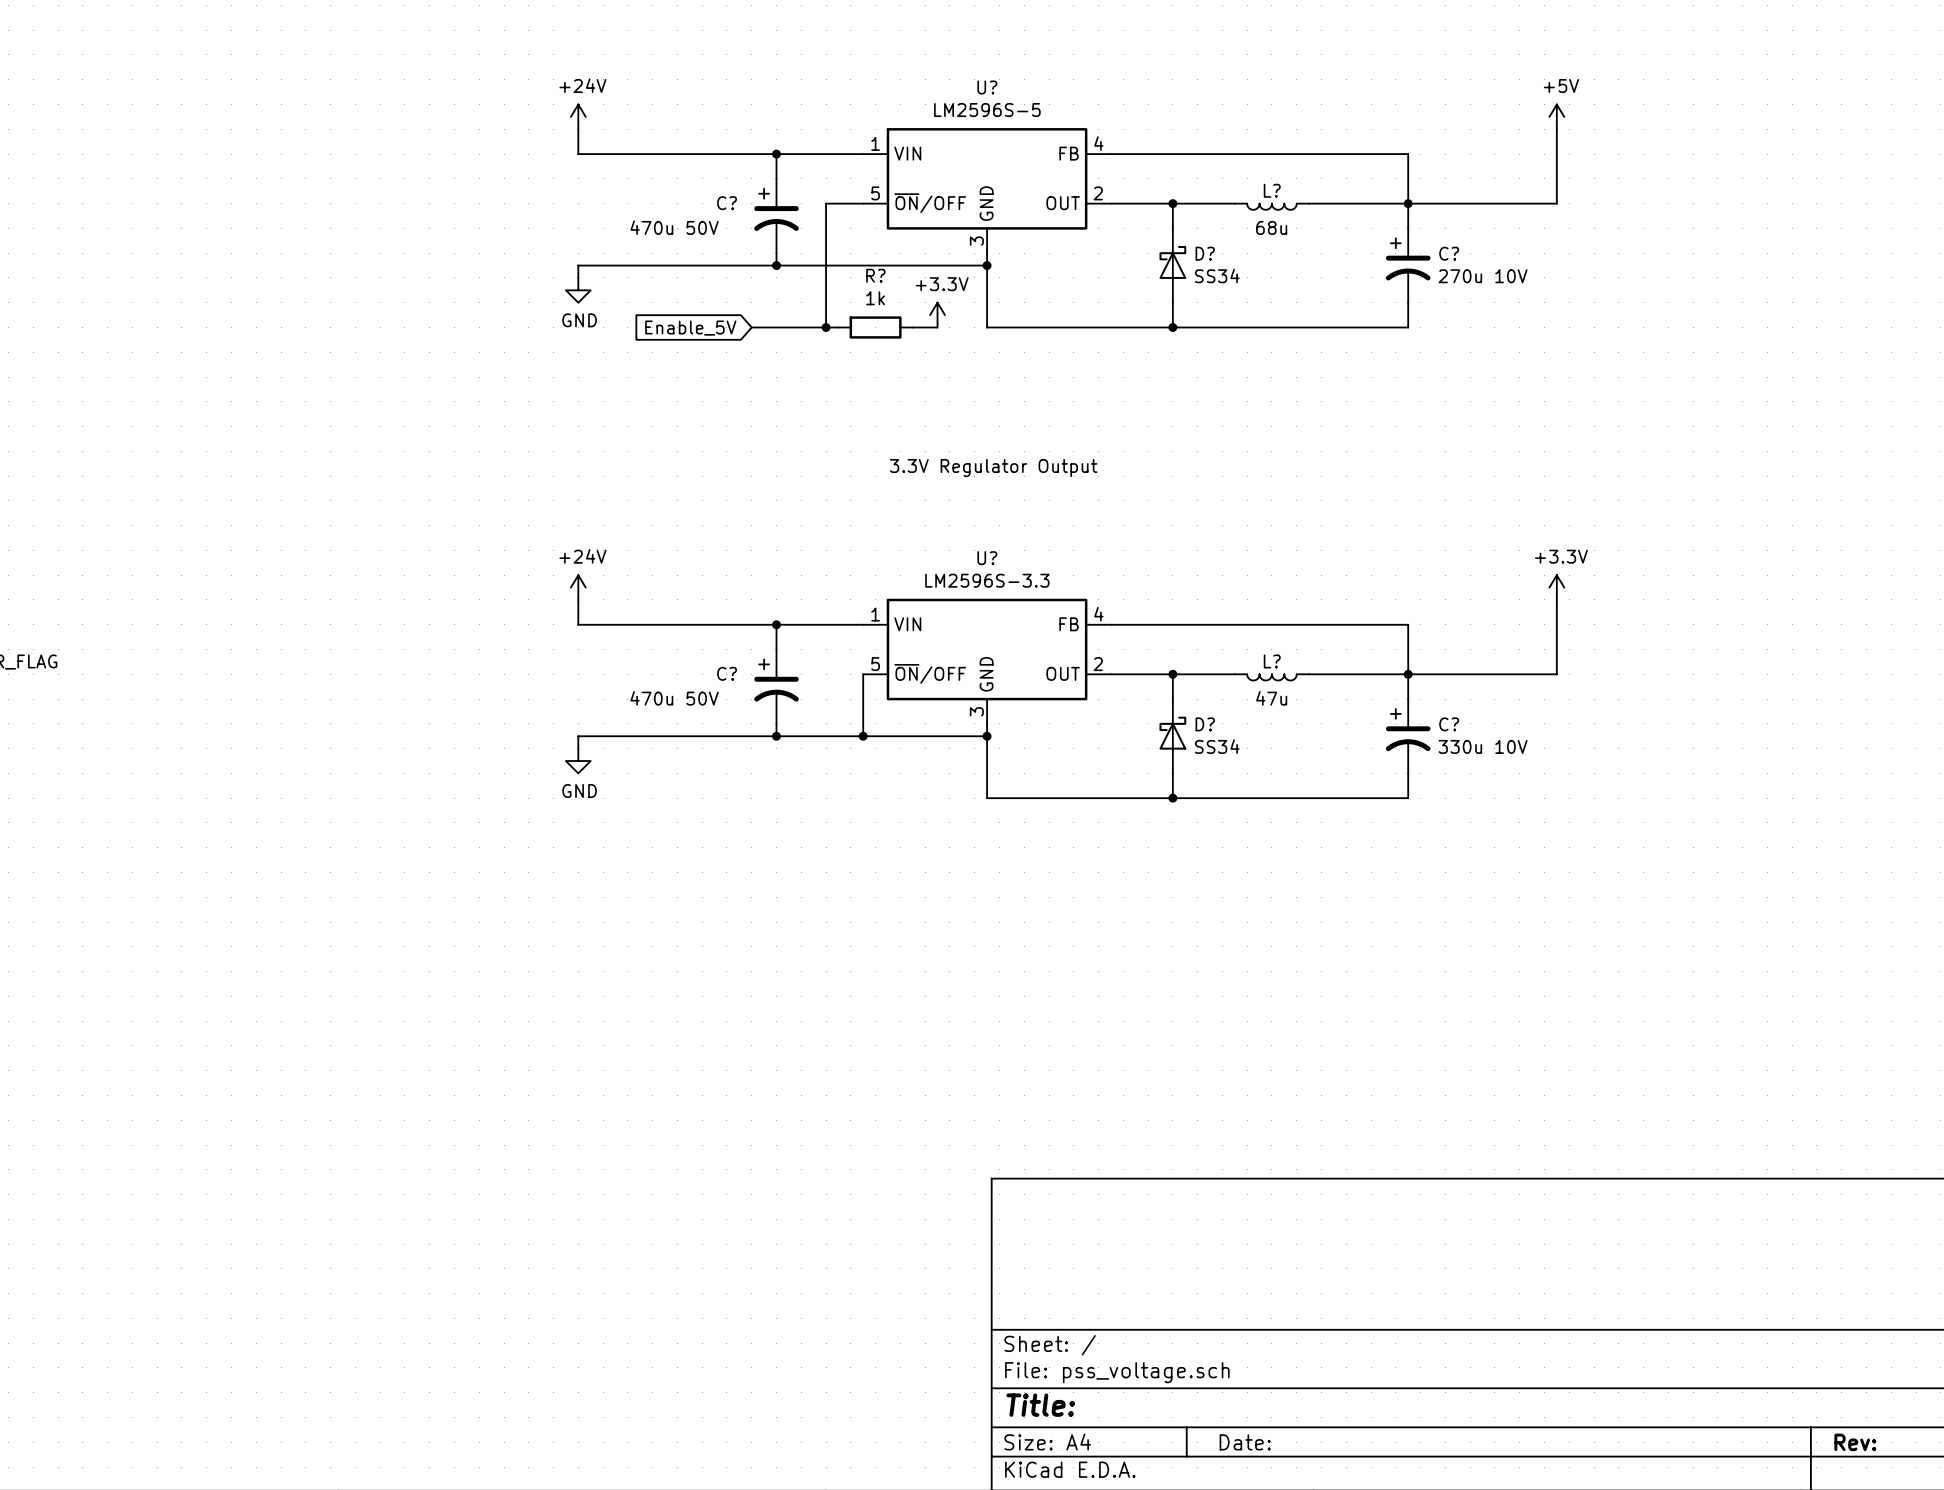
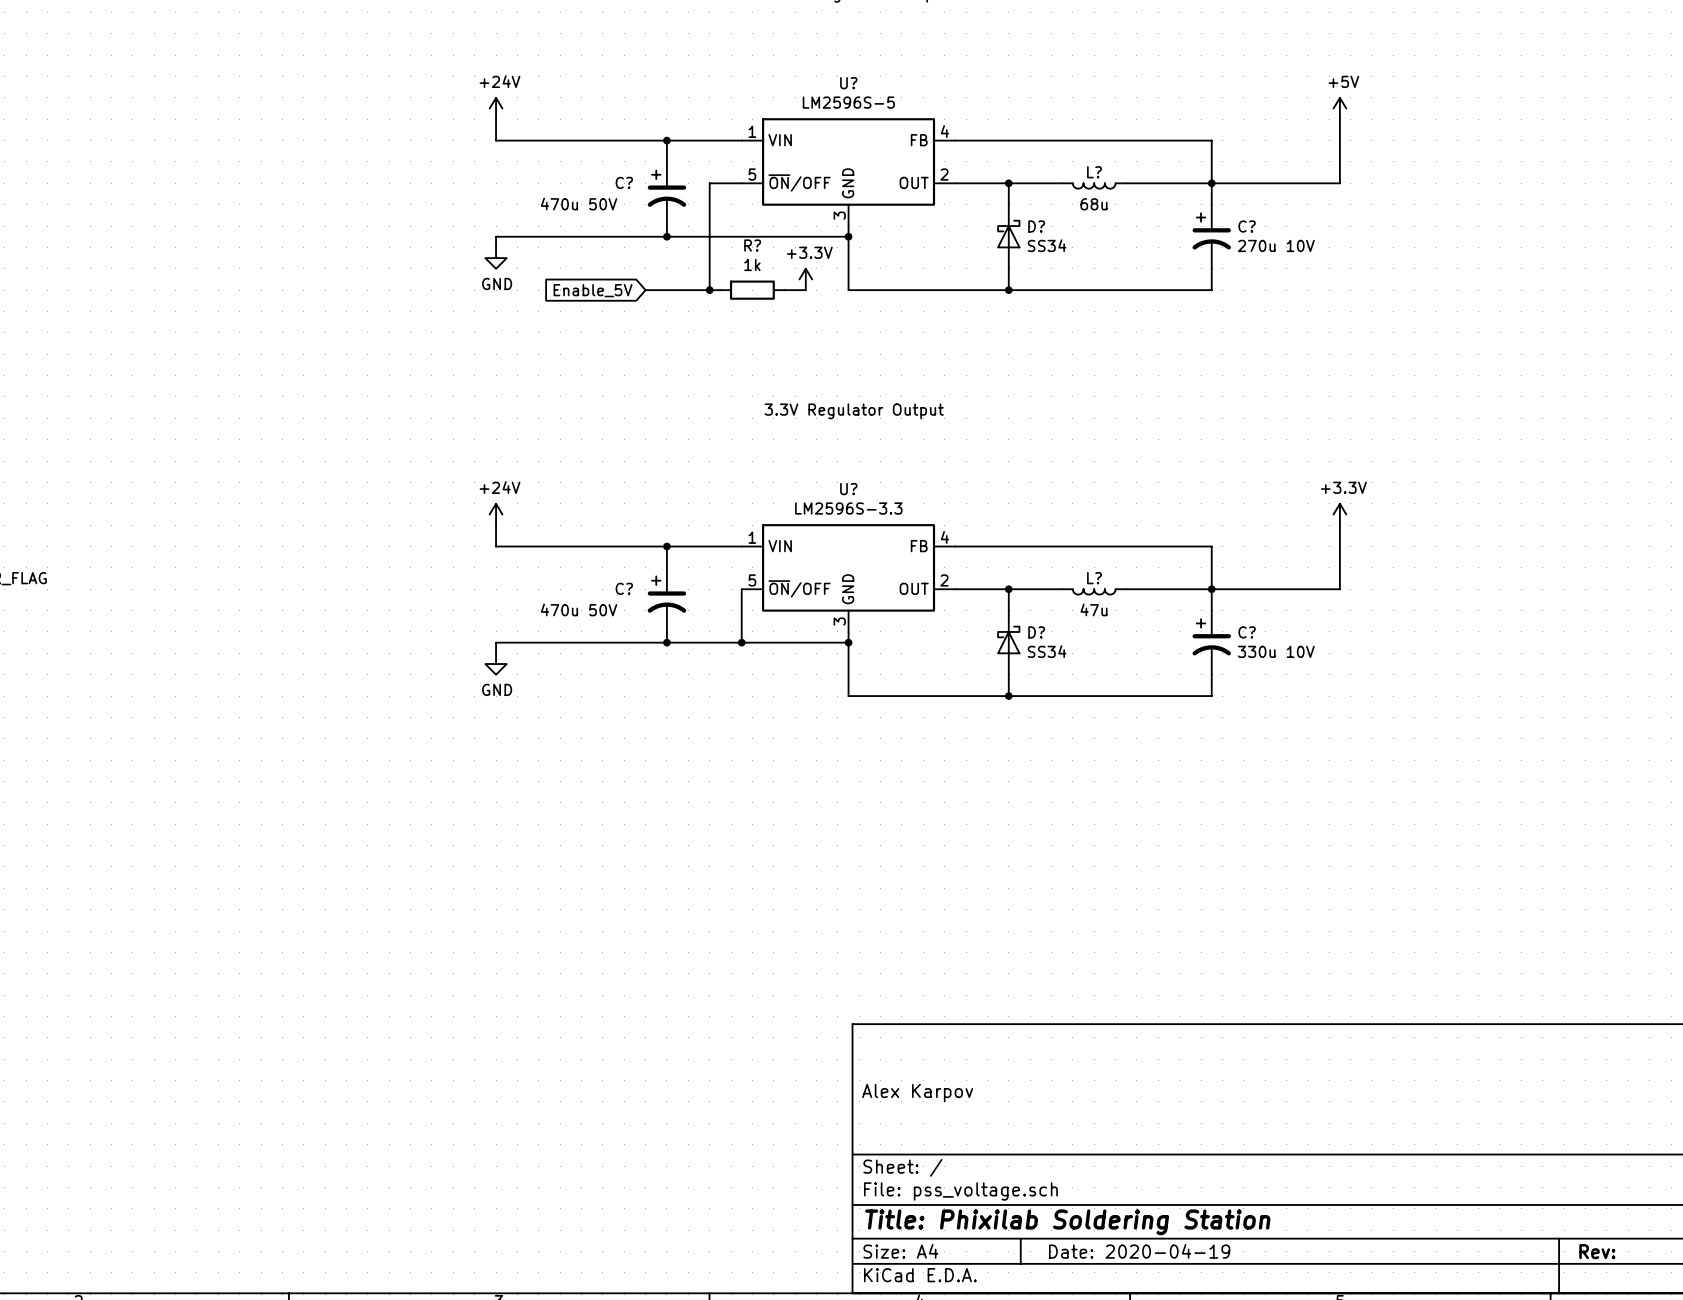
title block: none -> Alex Karpov (917, 1093)
title block: Title: (1040, 1405) -> Title: Phixilab Soldering Station (1067, 1222)
title block: Date: (1245, 1442) -> Date: 2020-04-19 (1139, 1251)

